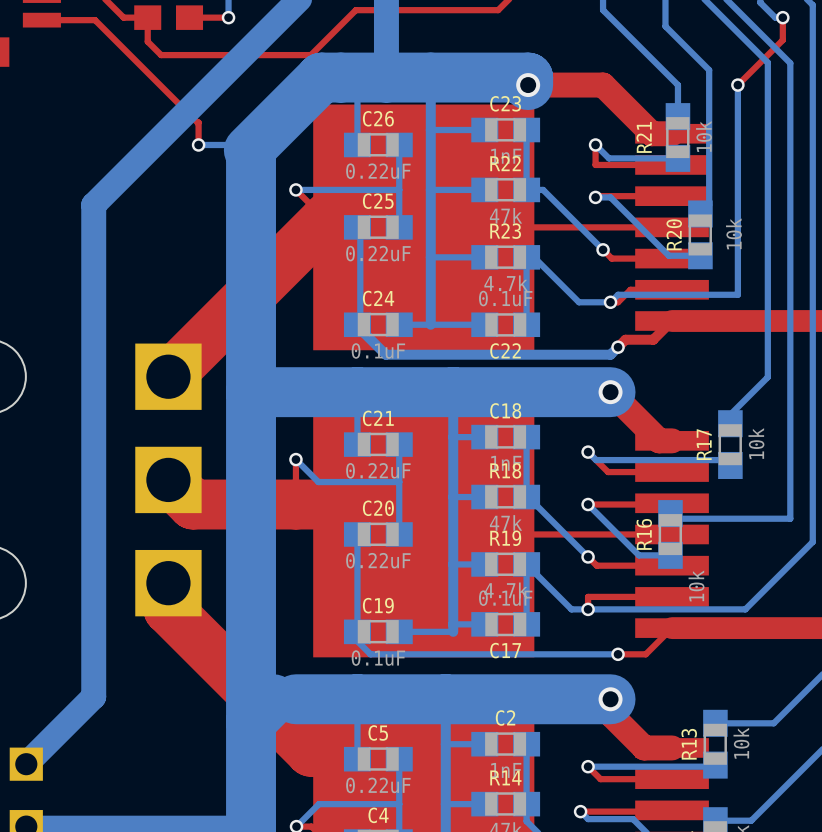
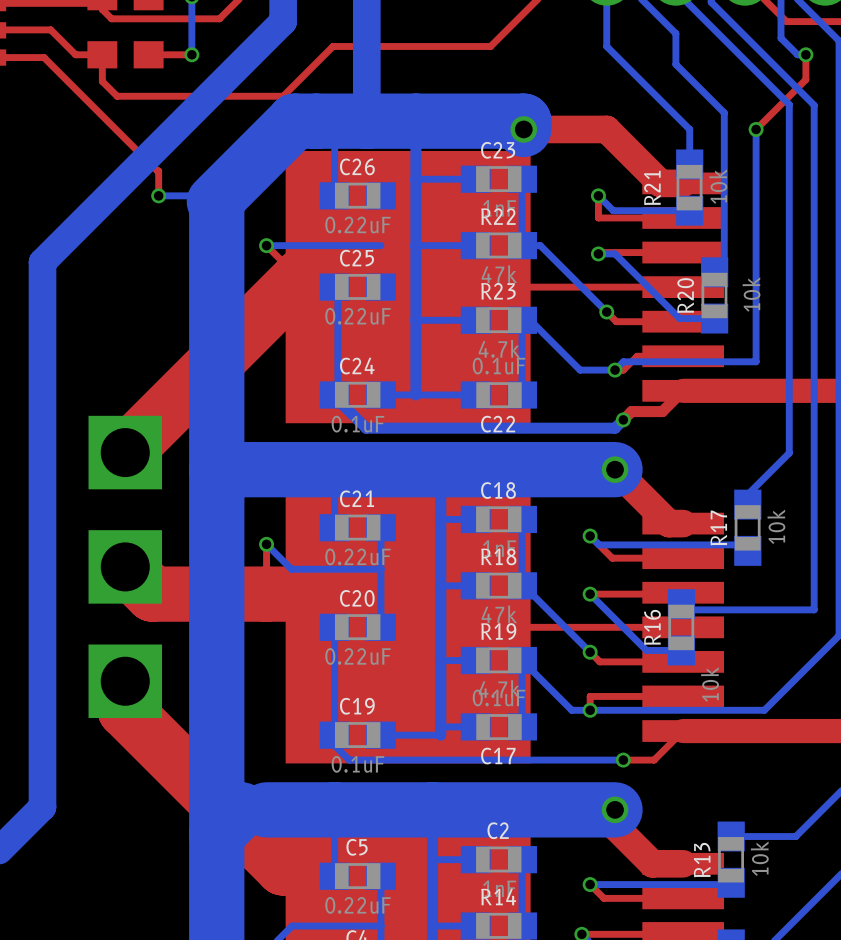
bottom track: (399, 144) (399, 227) -> none

